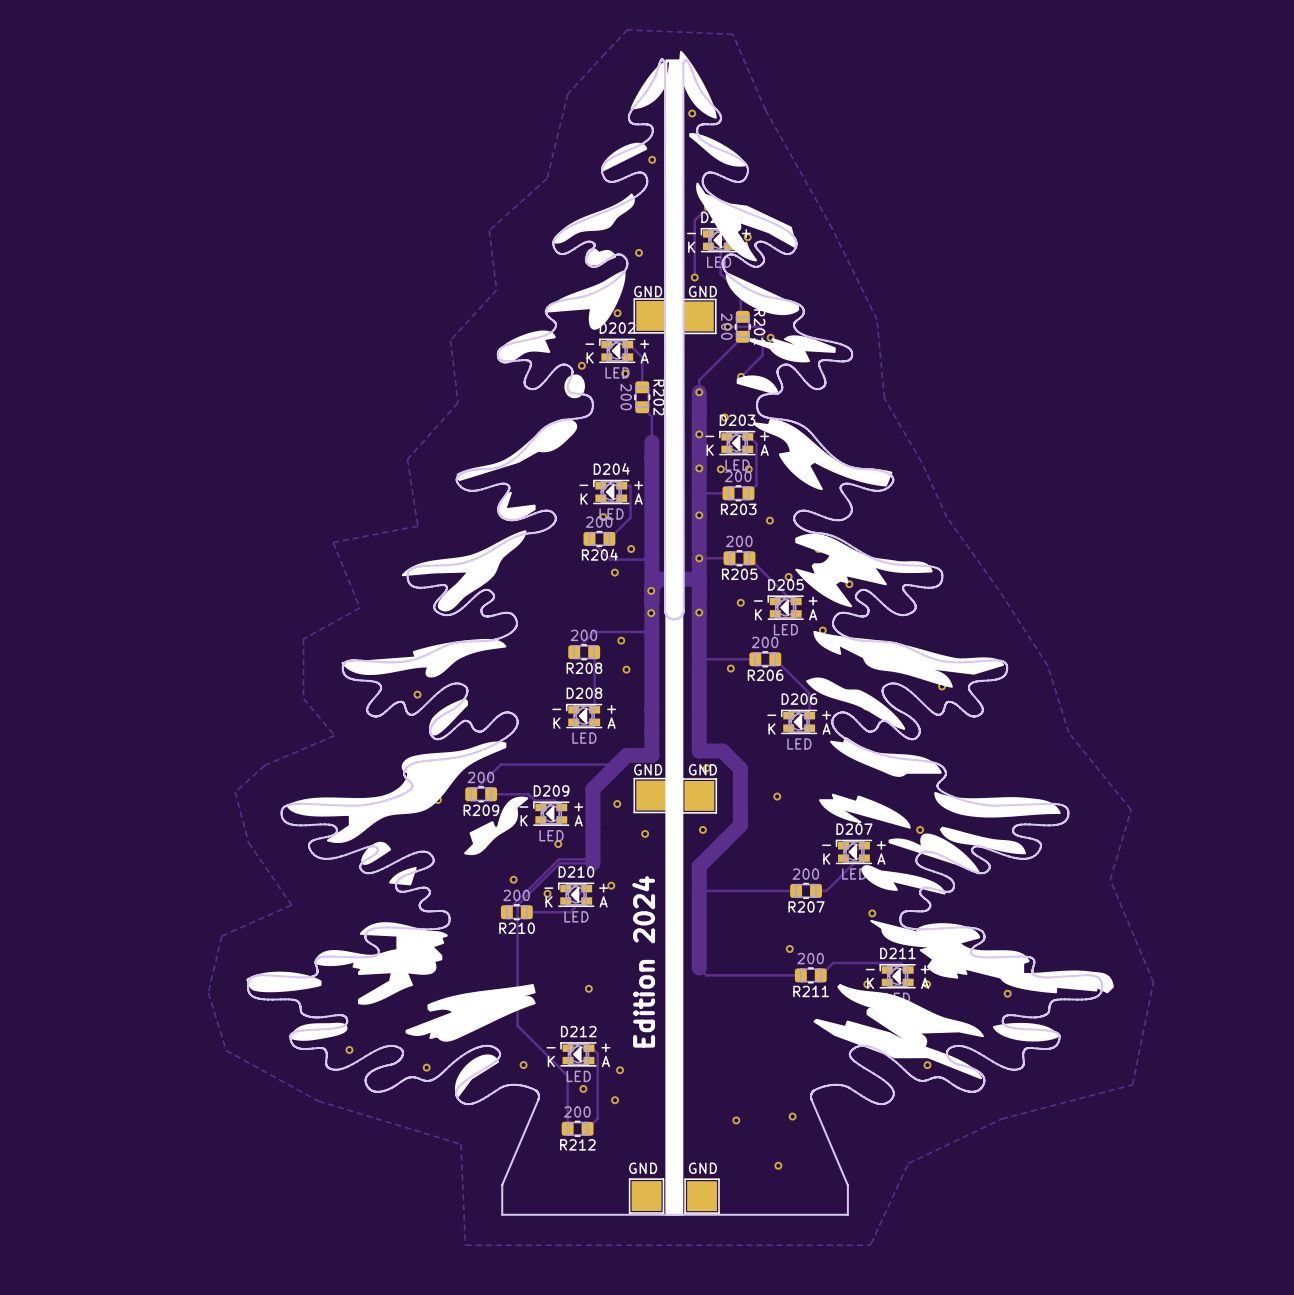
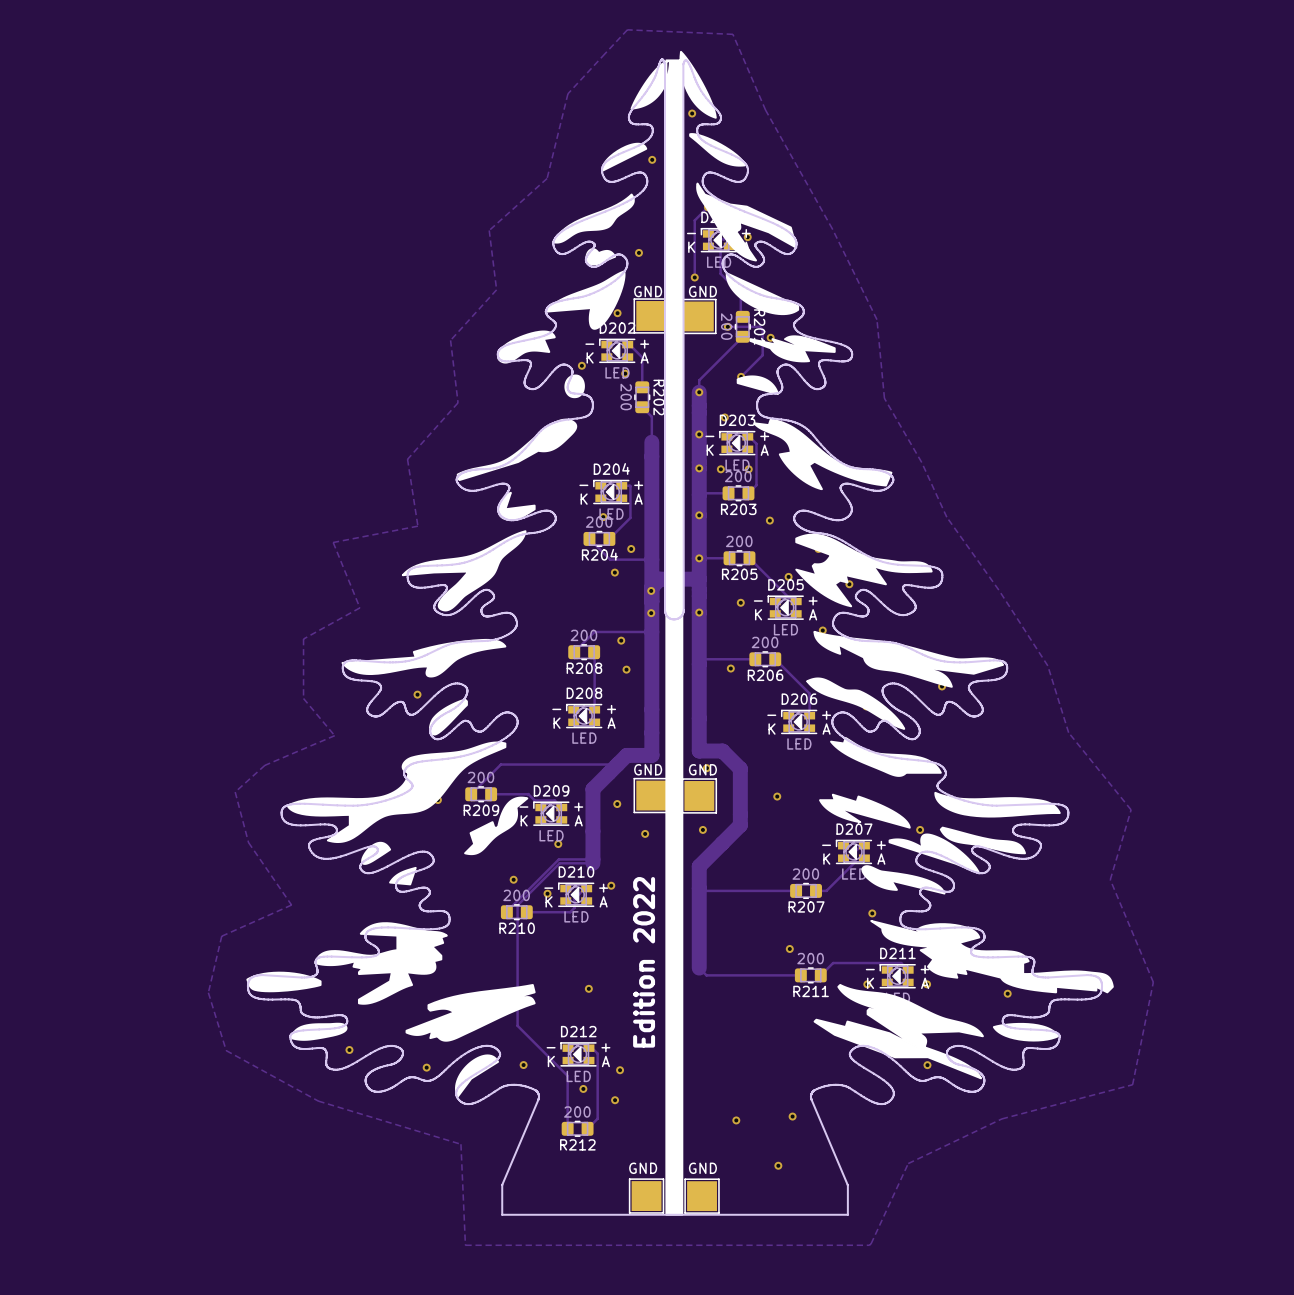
text: Edition 2024 (643, 961) -> none
text: none -> Edition 2022 (644, 962)

